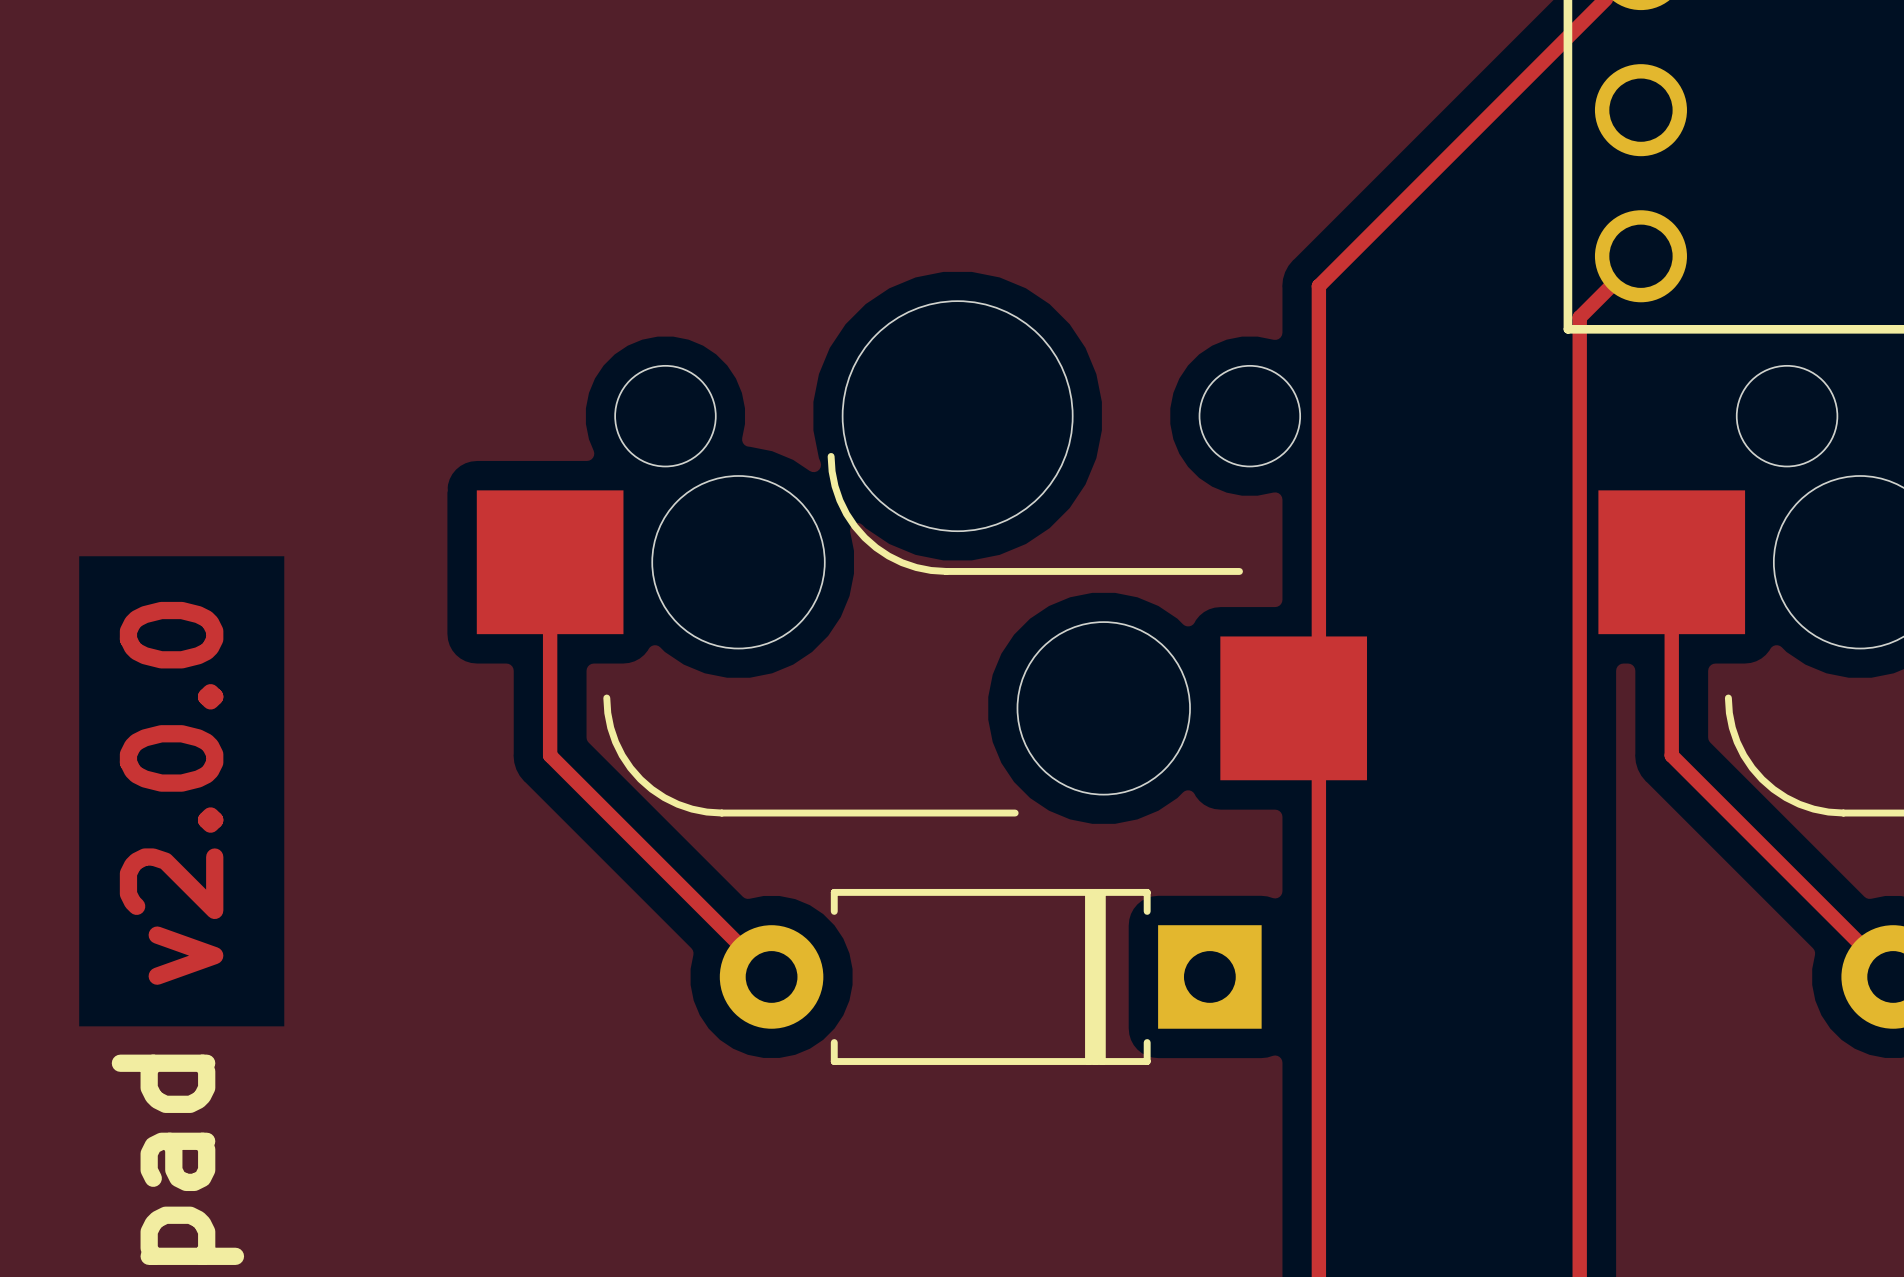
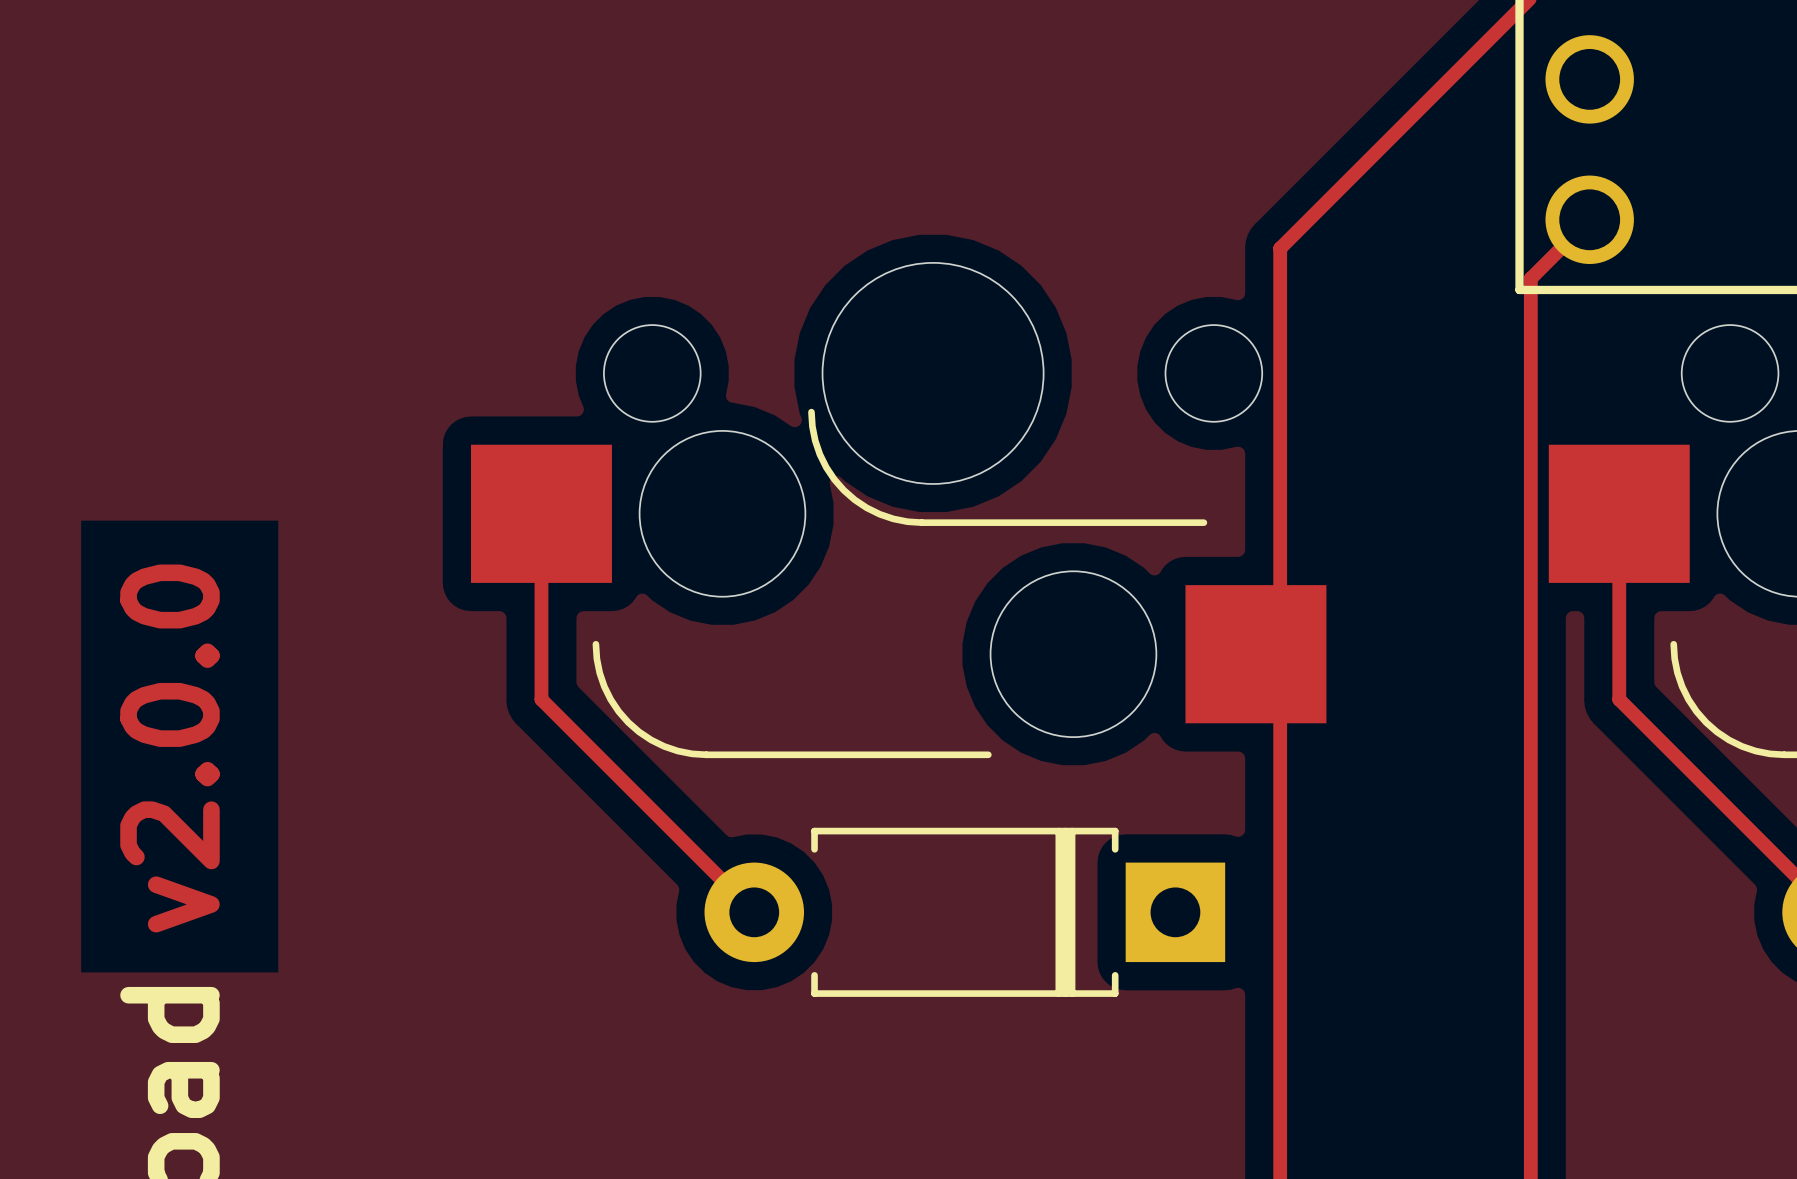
text position: v2.0.0 (171, 793) -> v2.0.0 (169, 748)

